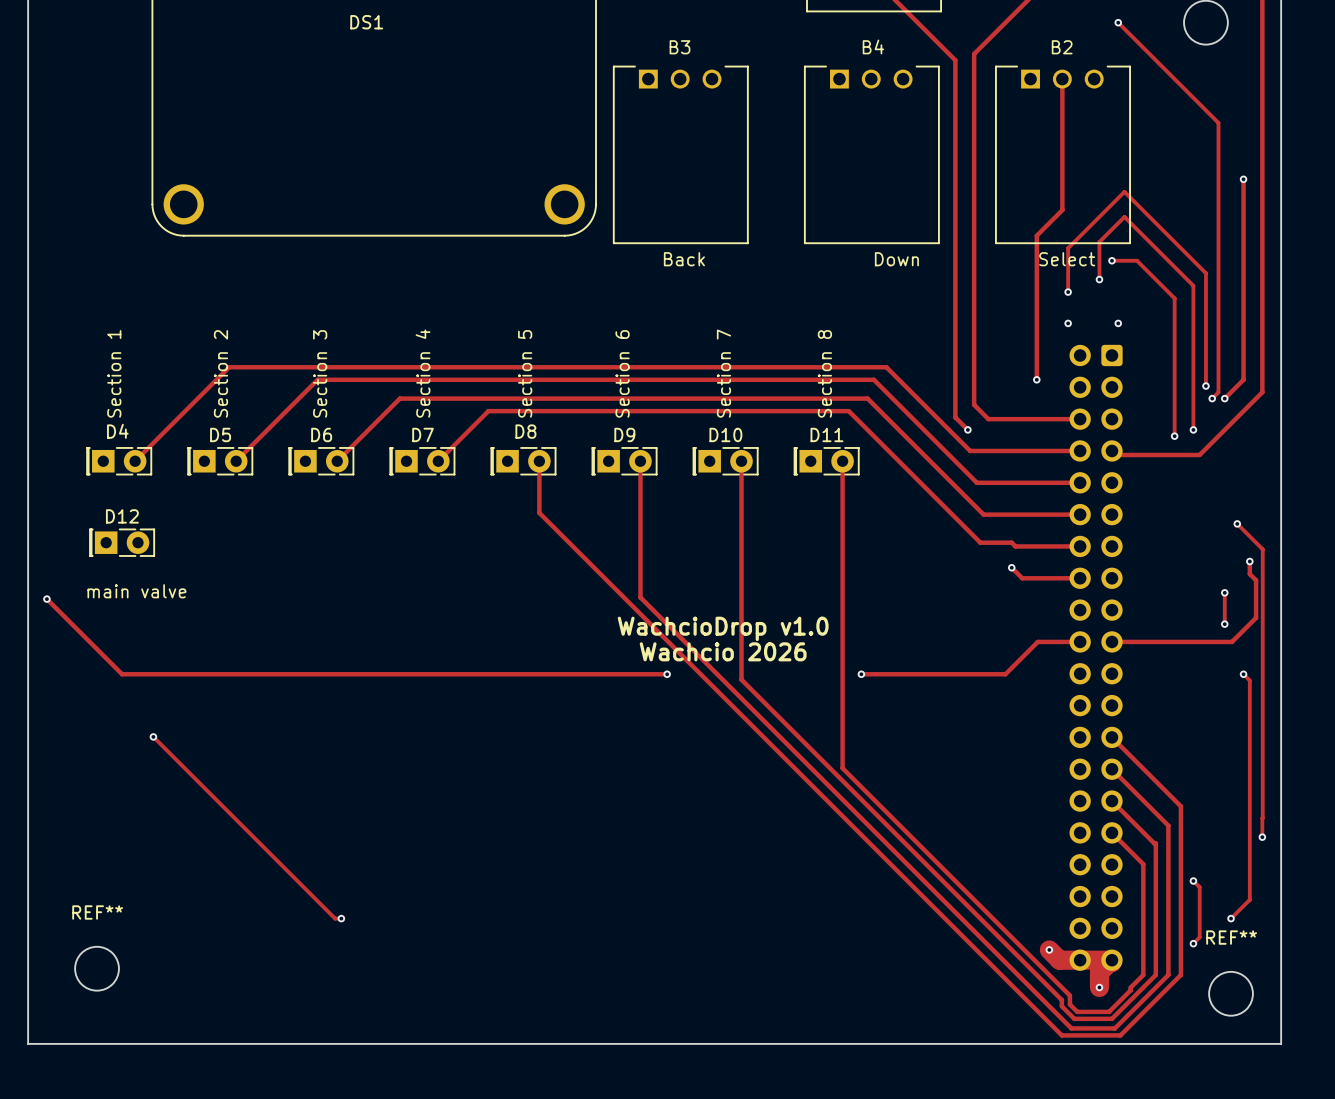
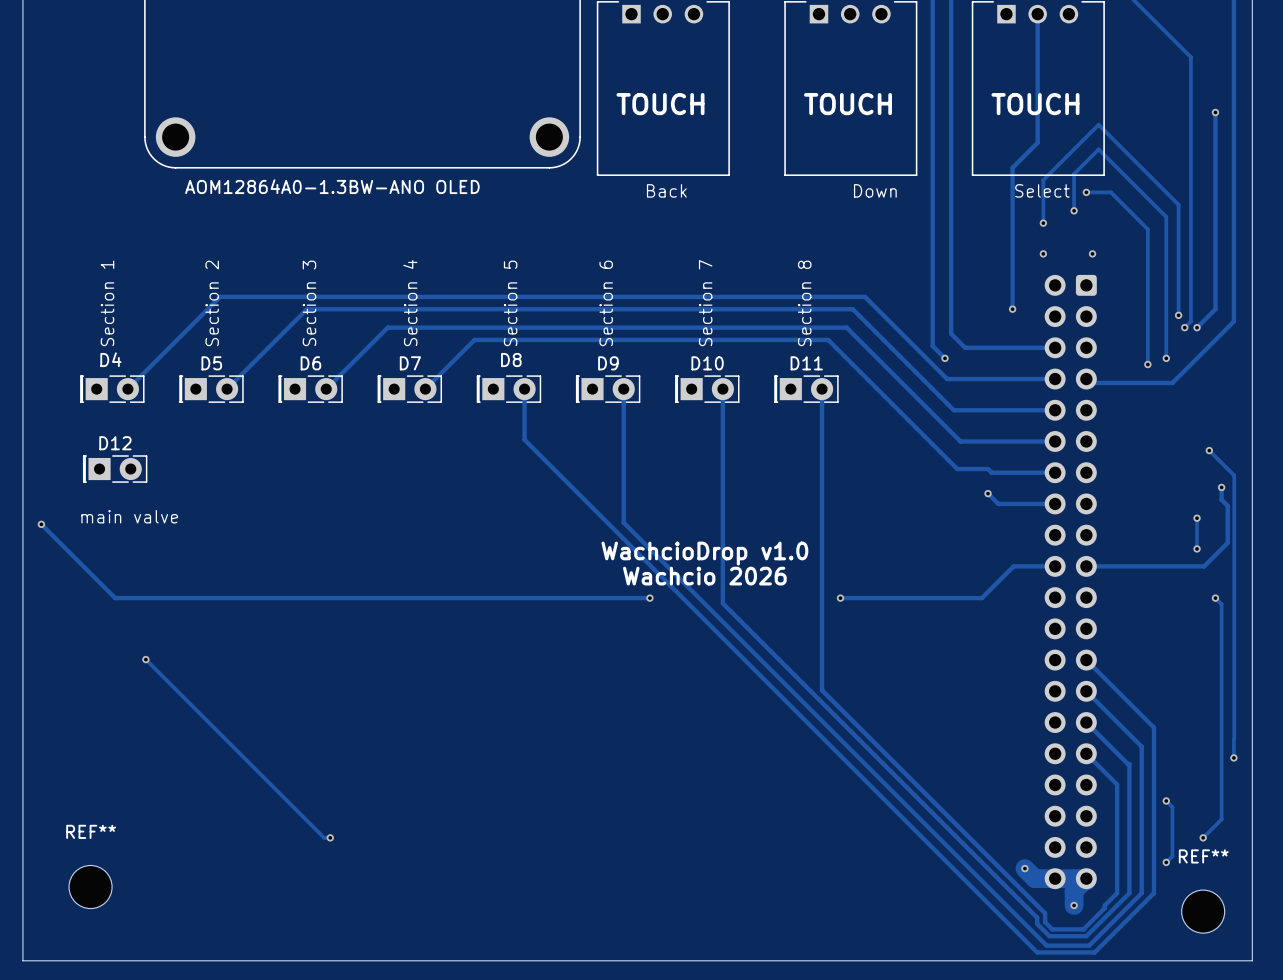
B3 text: none -> TOUCH (660, 104)
B4 text: none -> TOUCH (847, 104)
B2 text: none -> TOUCH (1035, 104)
DS1 value: none -> AOM12864A0-1.3BW-ANO OLED (332, 186)

